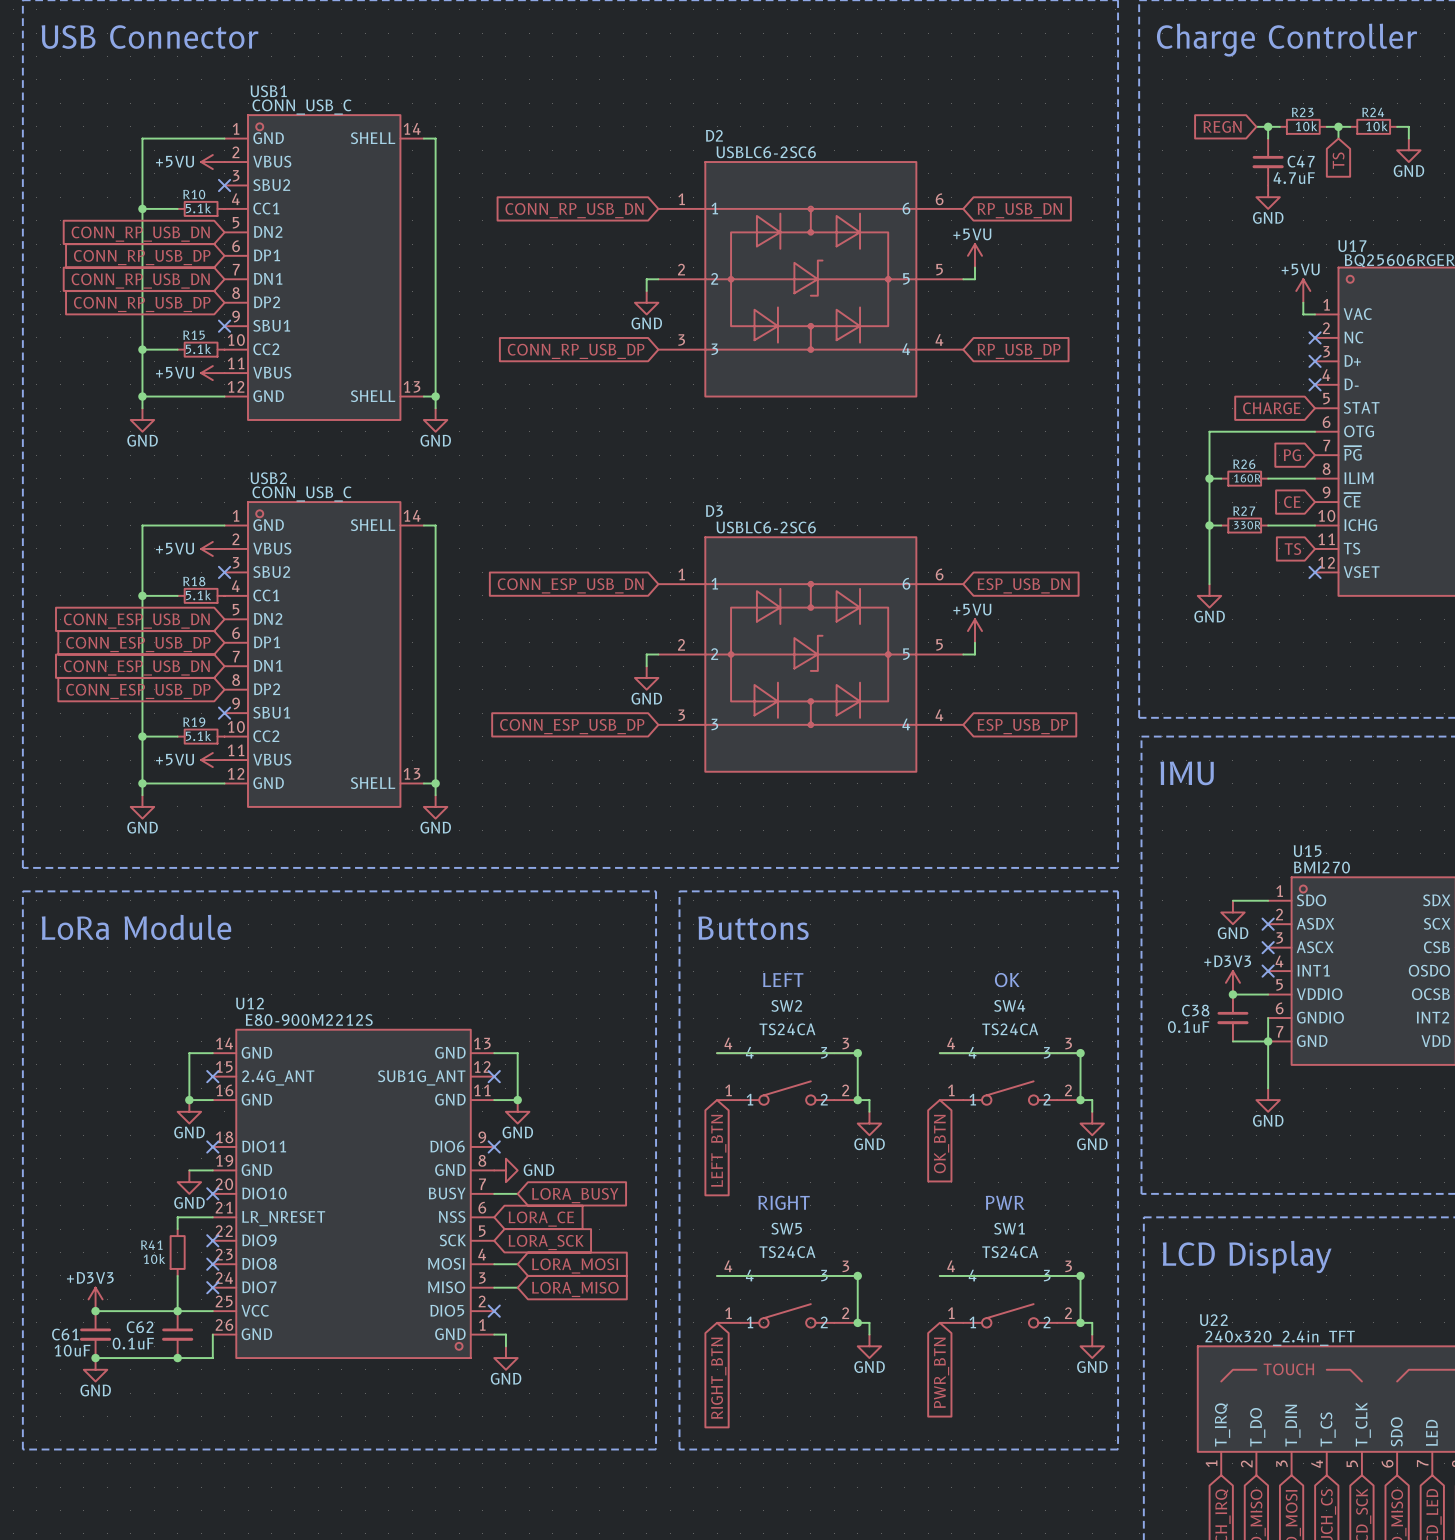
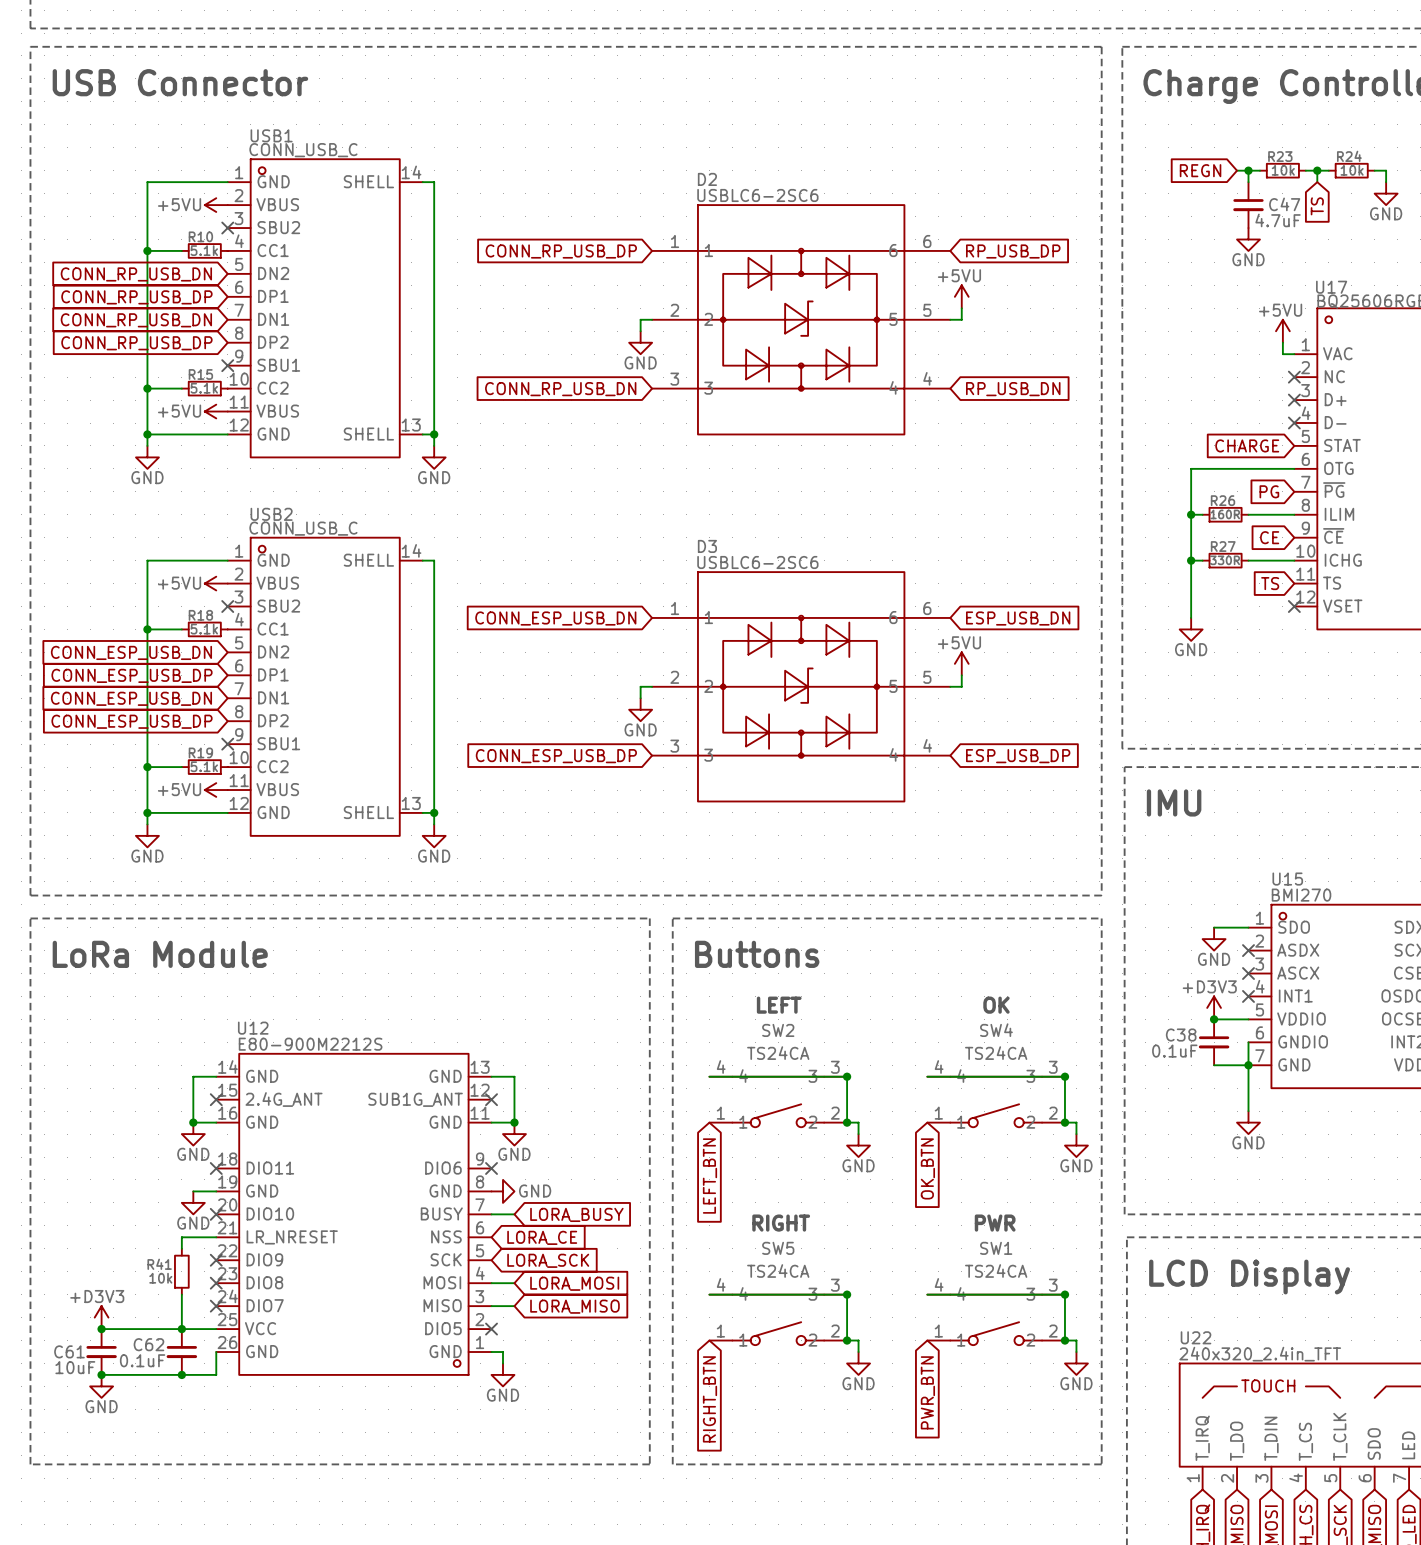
global label: CONN_RP_USB_DN (574, 210) -> CONN_RP_USB_DP (561, 251)
global label: RP_USB_DN (1019, 210) -> RP_USB_DP (1013, 251)
global label: CONN_RP_USB_DP (576, 351) -> CONN_RP_USB_DN (560, 389)
global label: RP_USB_DP (1019, 351) -> RP_USB_DN (1013, 389)

